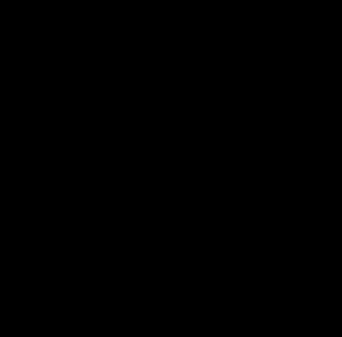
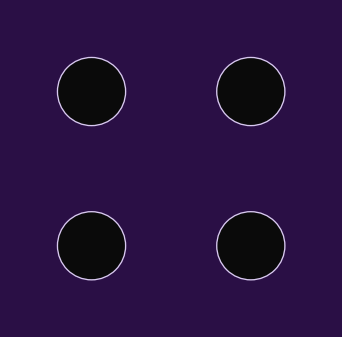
part: none -> (91, 91)
part: none -> (250, 91)
part: none -> (91, 245)
part: none -> (250, 245)

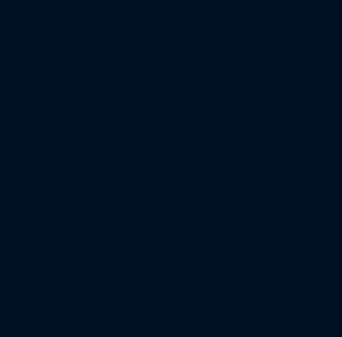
part: (91, 91) -> none
part: (250, 91) -> none
part: (91, 245) -> none
part: (250, 245) -> none

